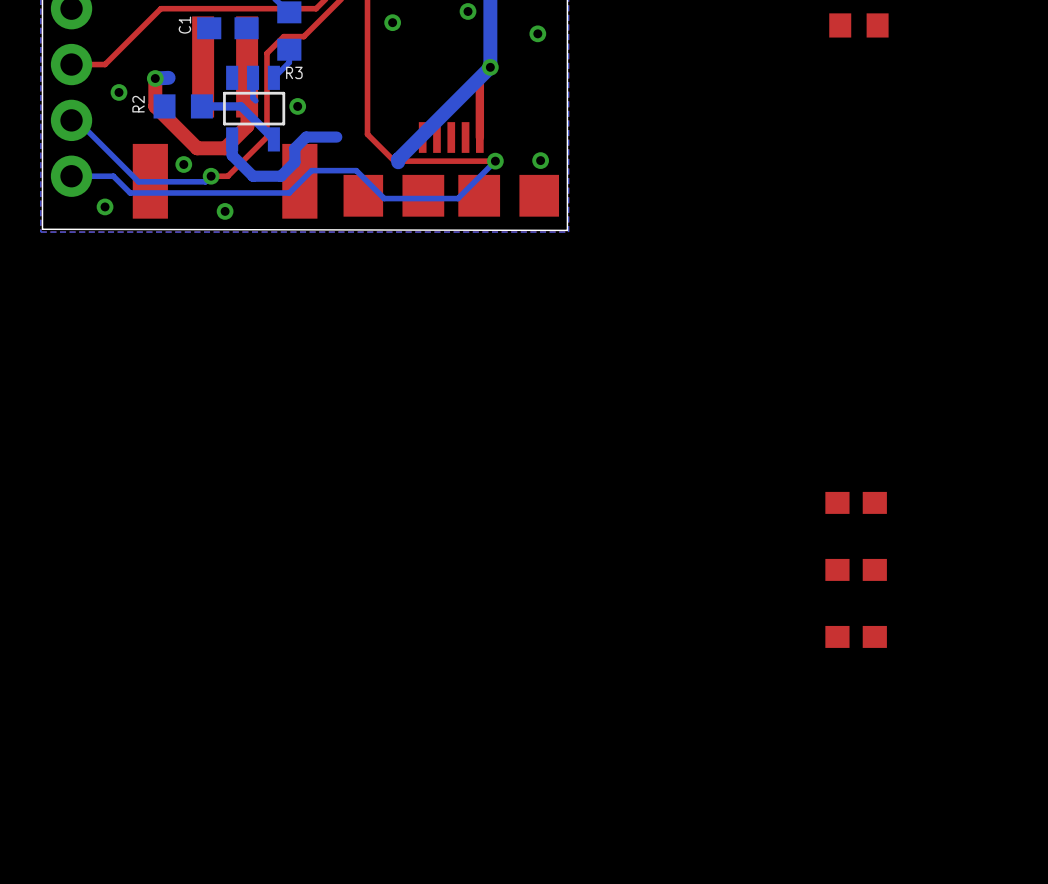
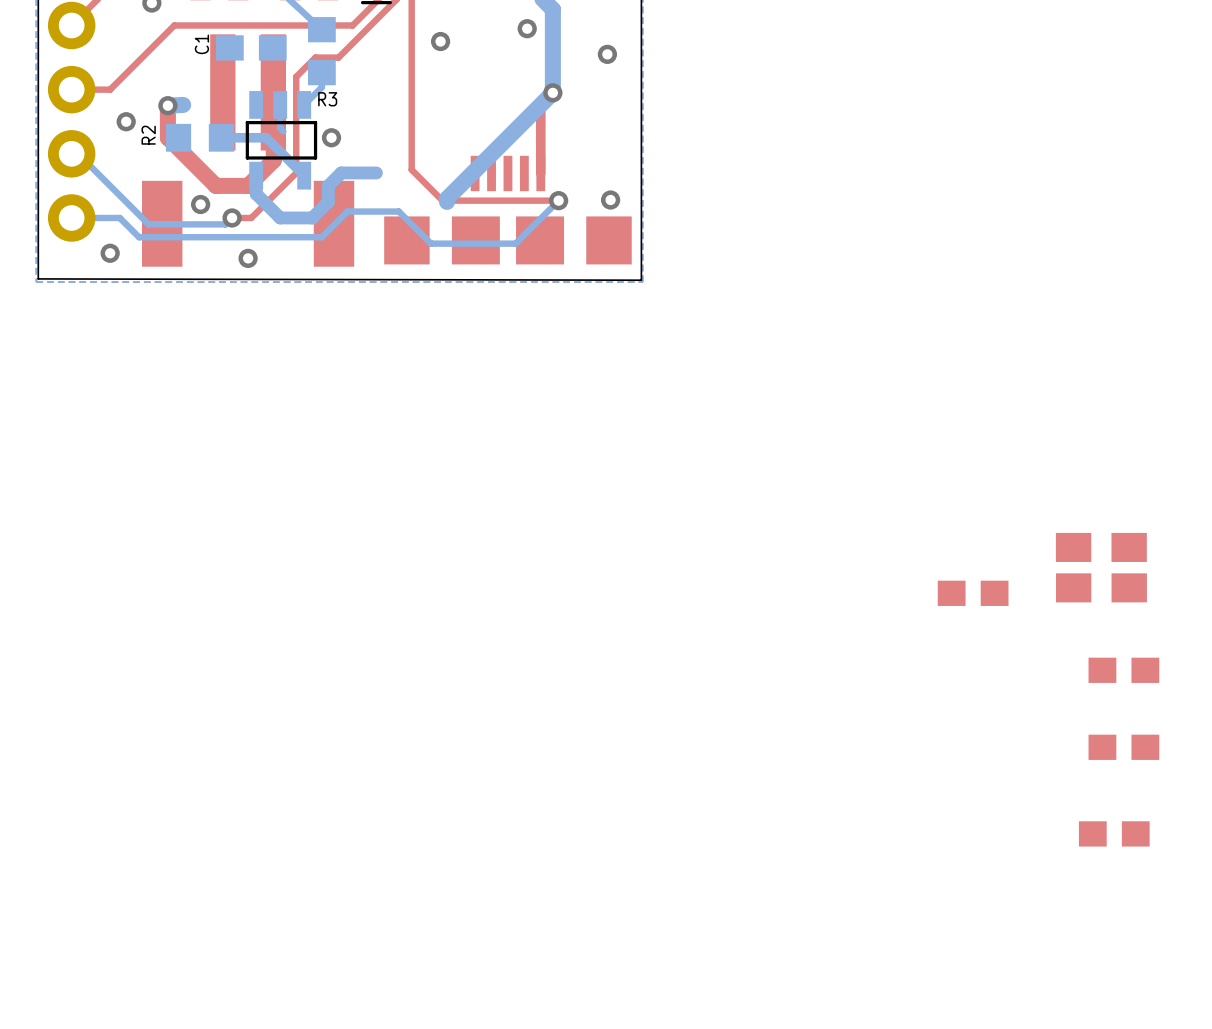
part: (858, 25) -> none
part: none -> (1101, 567)
part: (856, 569) -> none
part: none -> (1123, 670)
part: (856, 636) -> none
part: none -> (1123, 747)
part: none -> (1114, 833)

